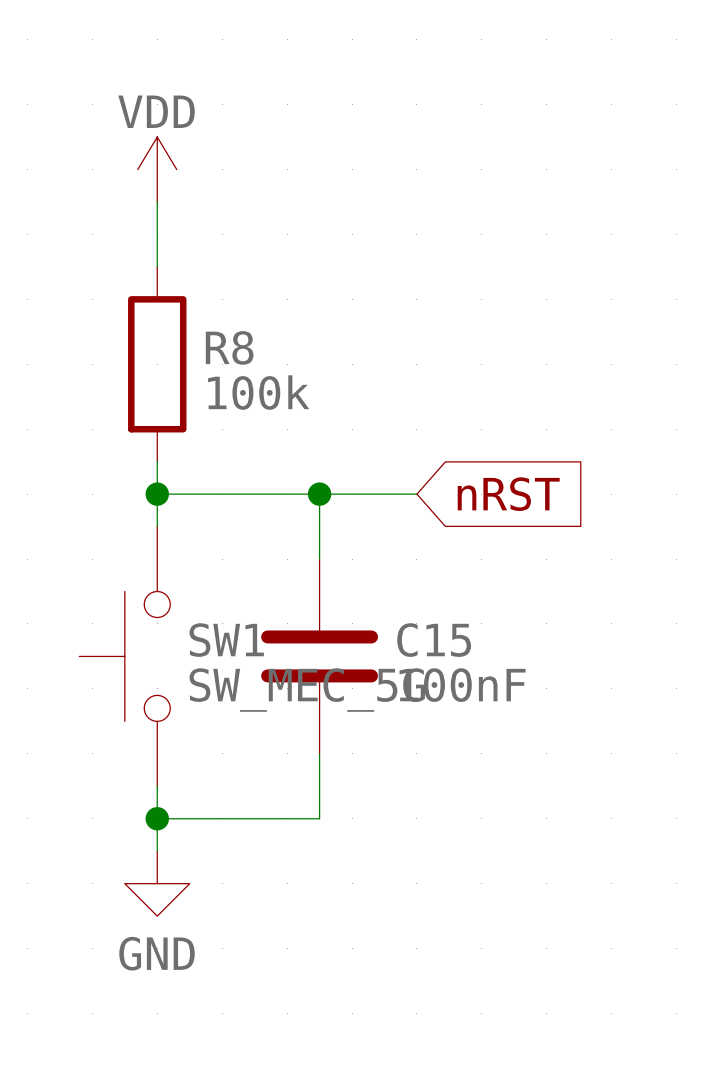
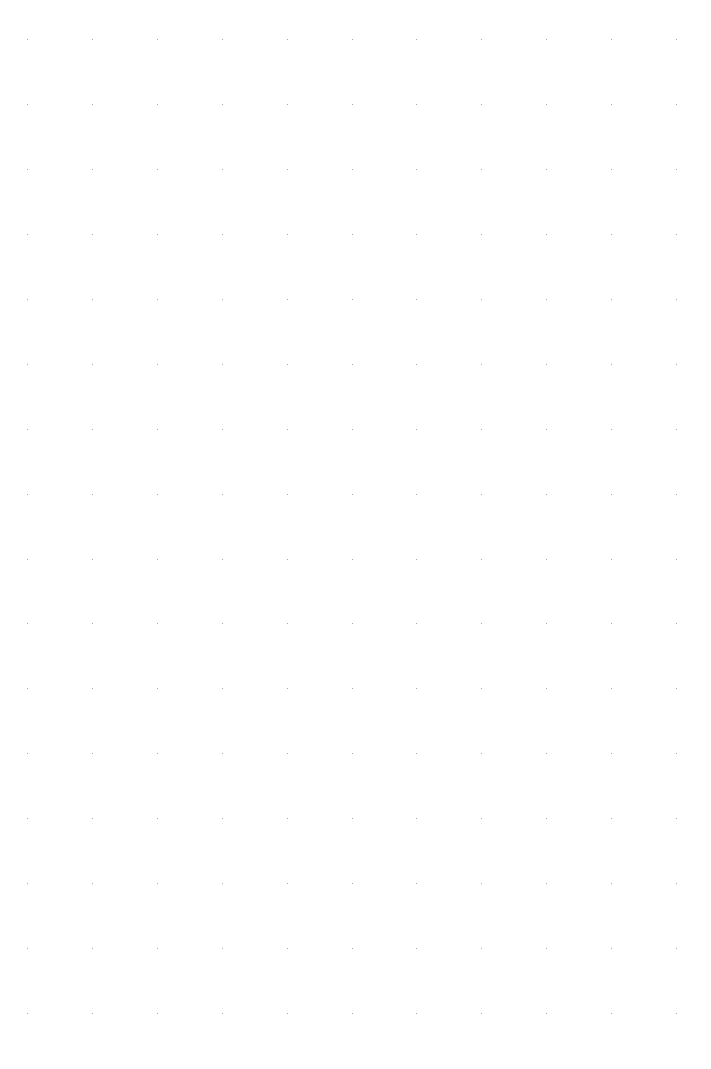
power symbol: VDD (157, 169) -> none
wire: (157, 201) (157, 266) -> none
R8: 100k (157, 364) -> none
wire: (157, 461) (157, 526) -> none
wire: (157, 494) (416, 494) -> none
junction: (157, 494) -> none
wire: (319, 494) (319, 559) -> none
junction: (319, 494) -> none
global label: nRST (508, 494) -> none
SW1: SW_MEC_5G (124, 656) -> none
C15: 100nF (319, 656) -> none
wire: (319, 753) (319, 818) (157, 818) -> none
wire: (157, 786) (157, 851) -> none
junction: (157, 818) -> none
power symbol: GND (157, 883) -> none

